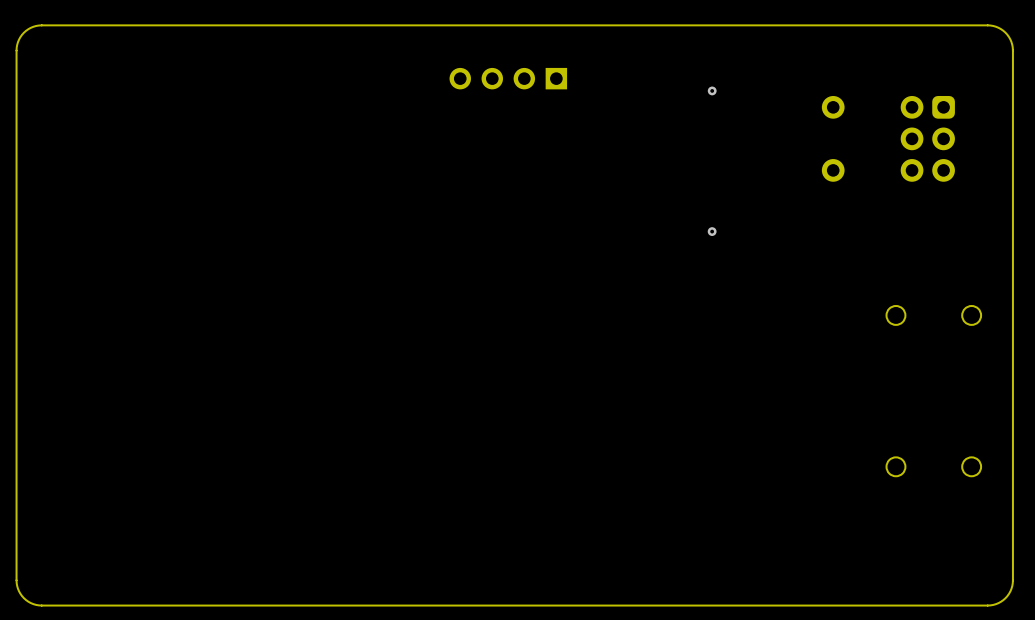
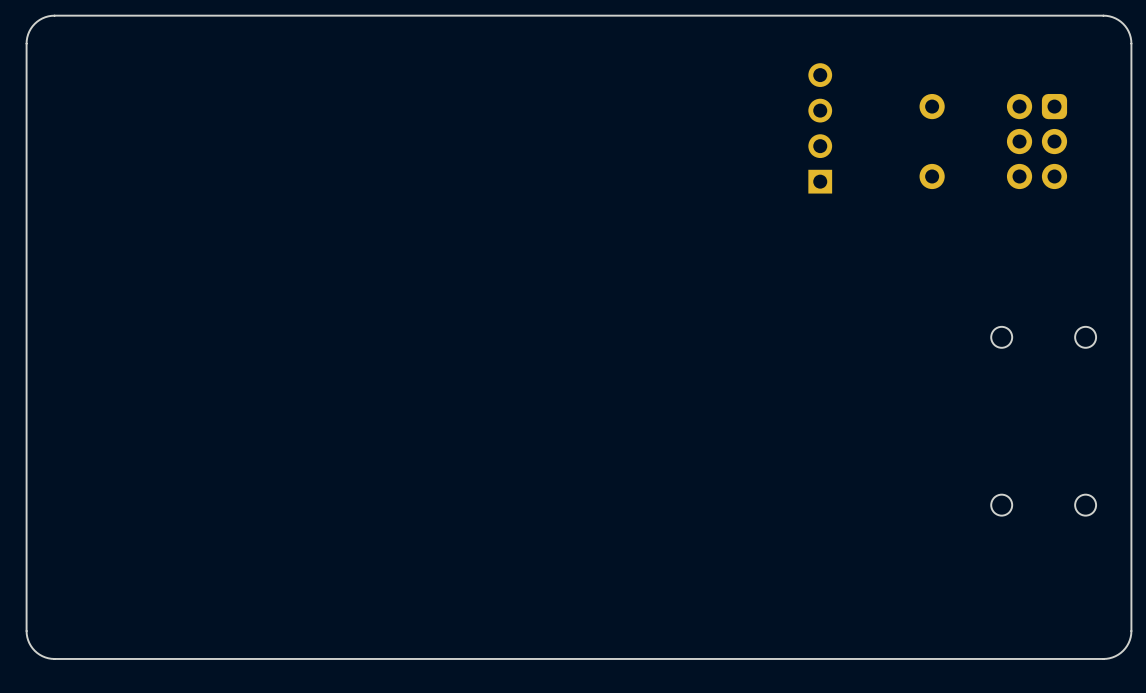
part rotation: 0° (508, 78) -> 90° clockwise (820, 128)
part position: (508, 78) -> (820, 128)
via: (712, 90) -> none
via: (712, 231) -> none

